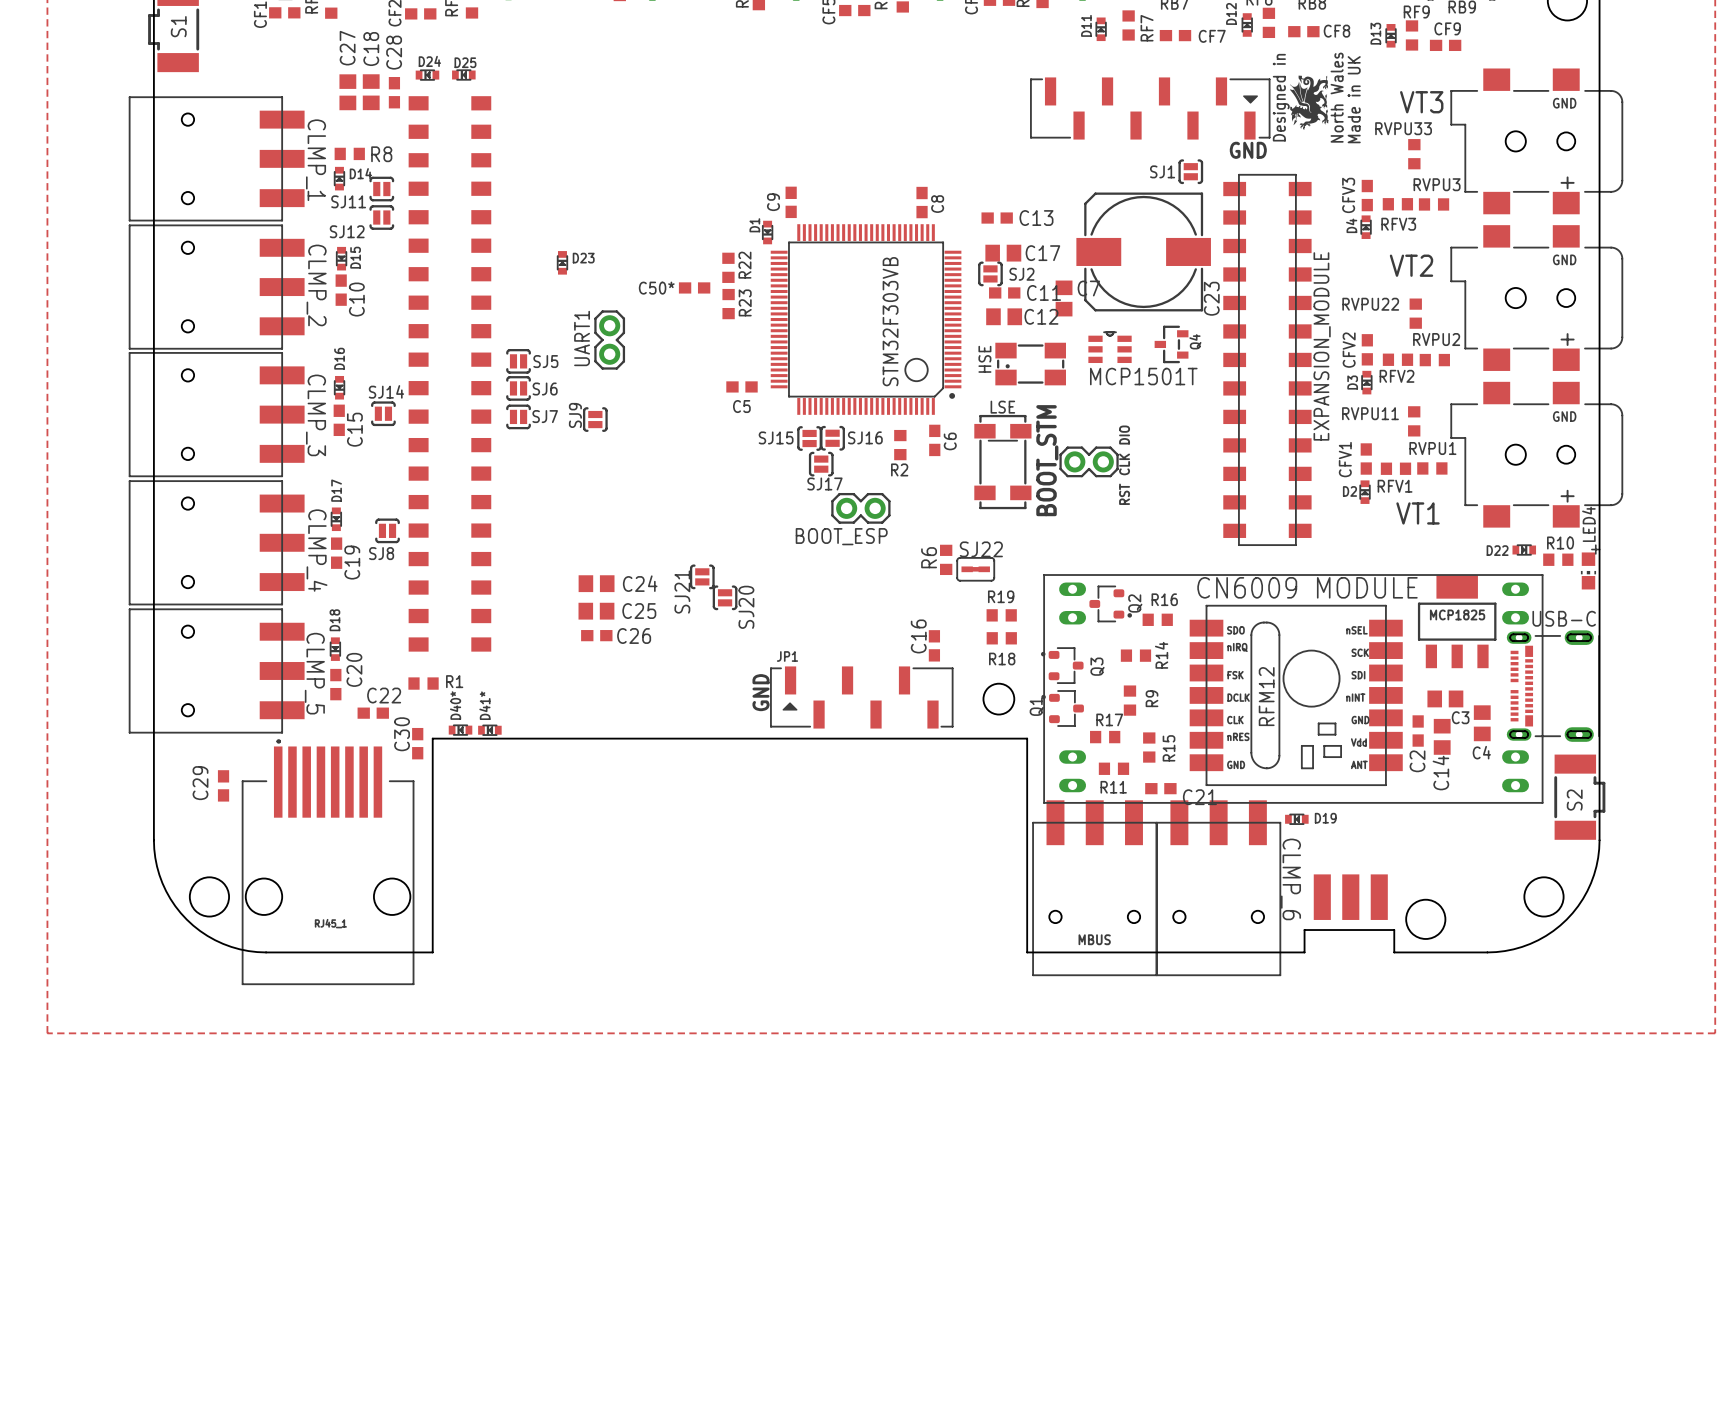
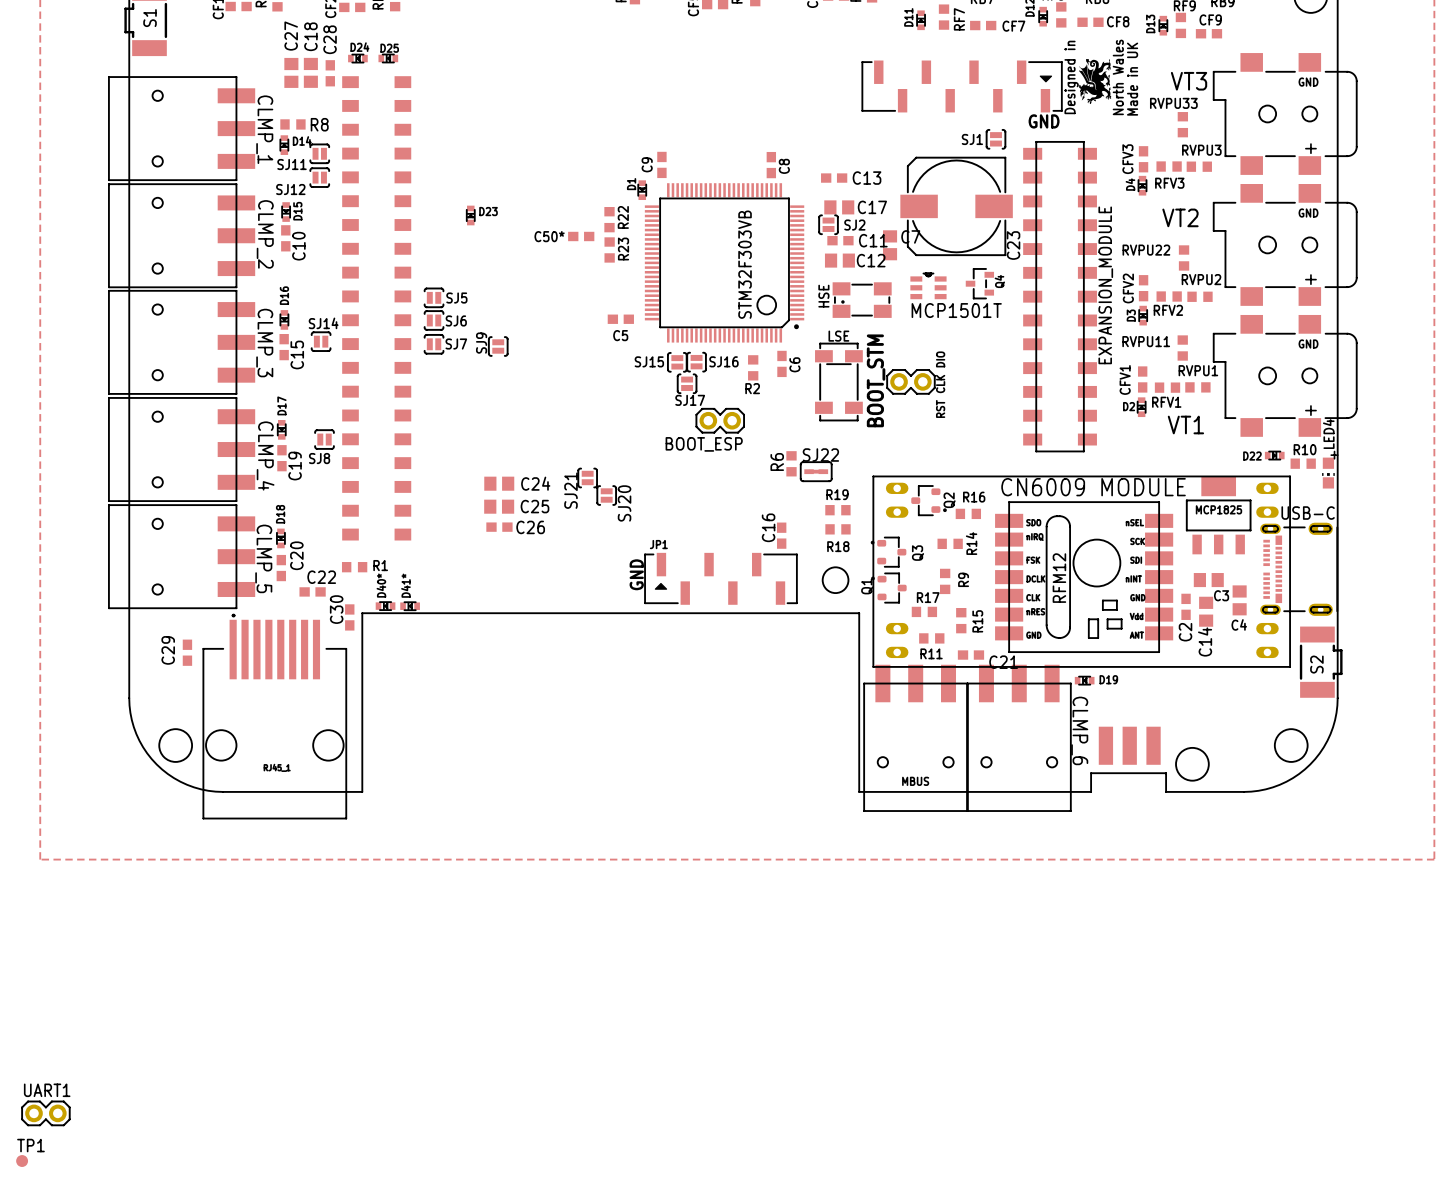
UART1 rotation: 0° (609, 340) -> 90° clockwise (45, 1113)
UART1 position: (609, 340) -> (45, 1113)
TP1: none -> (22, 1161)

